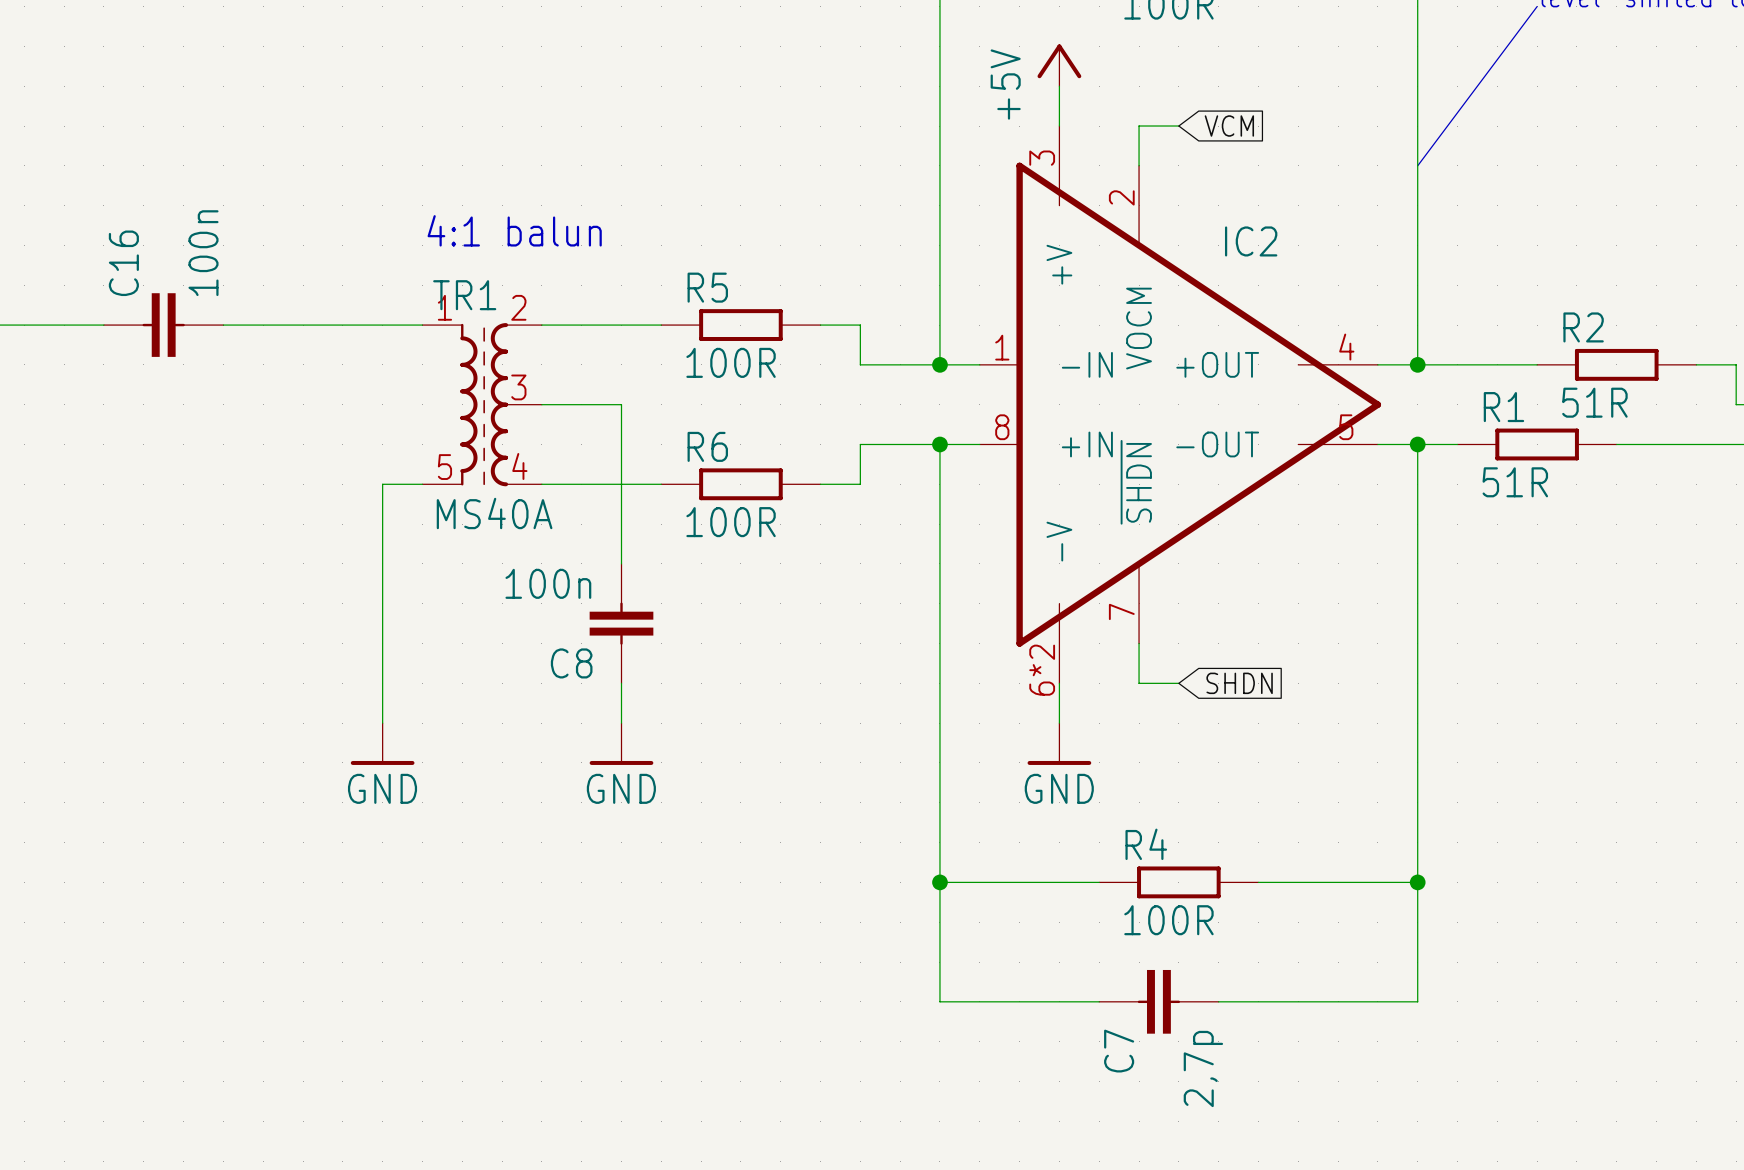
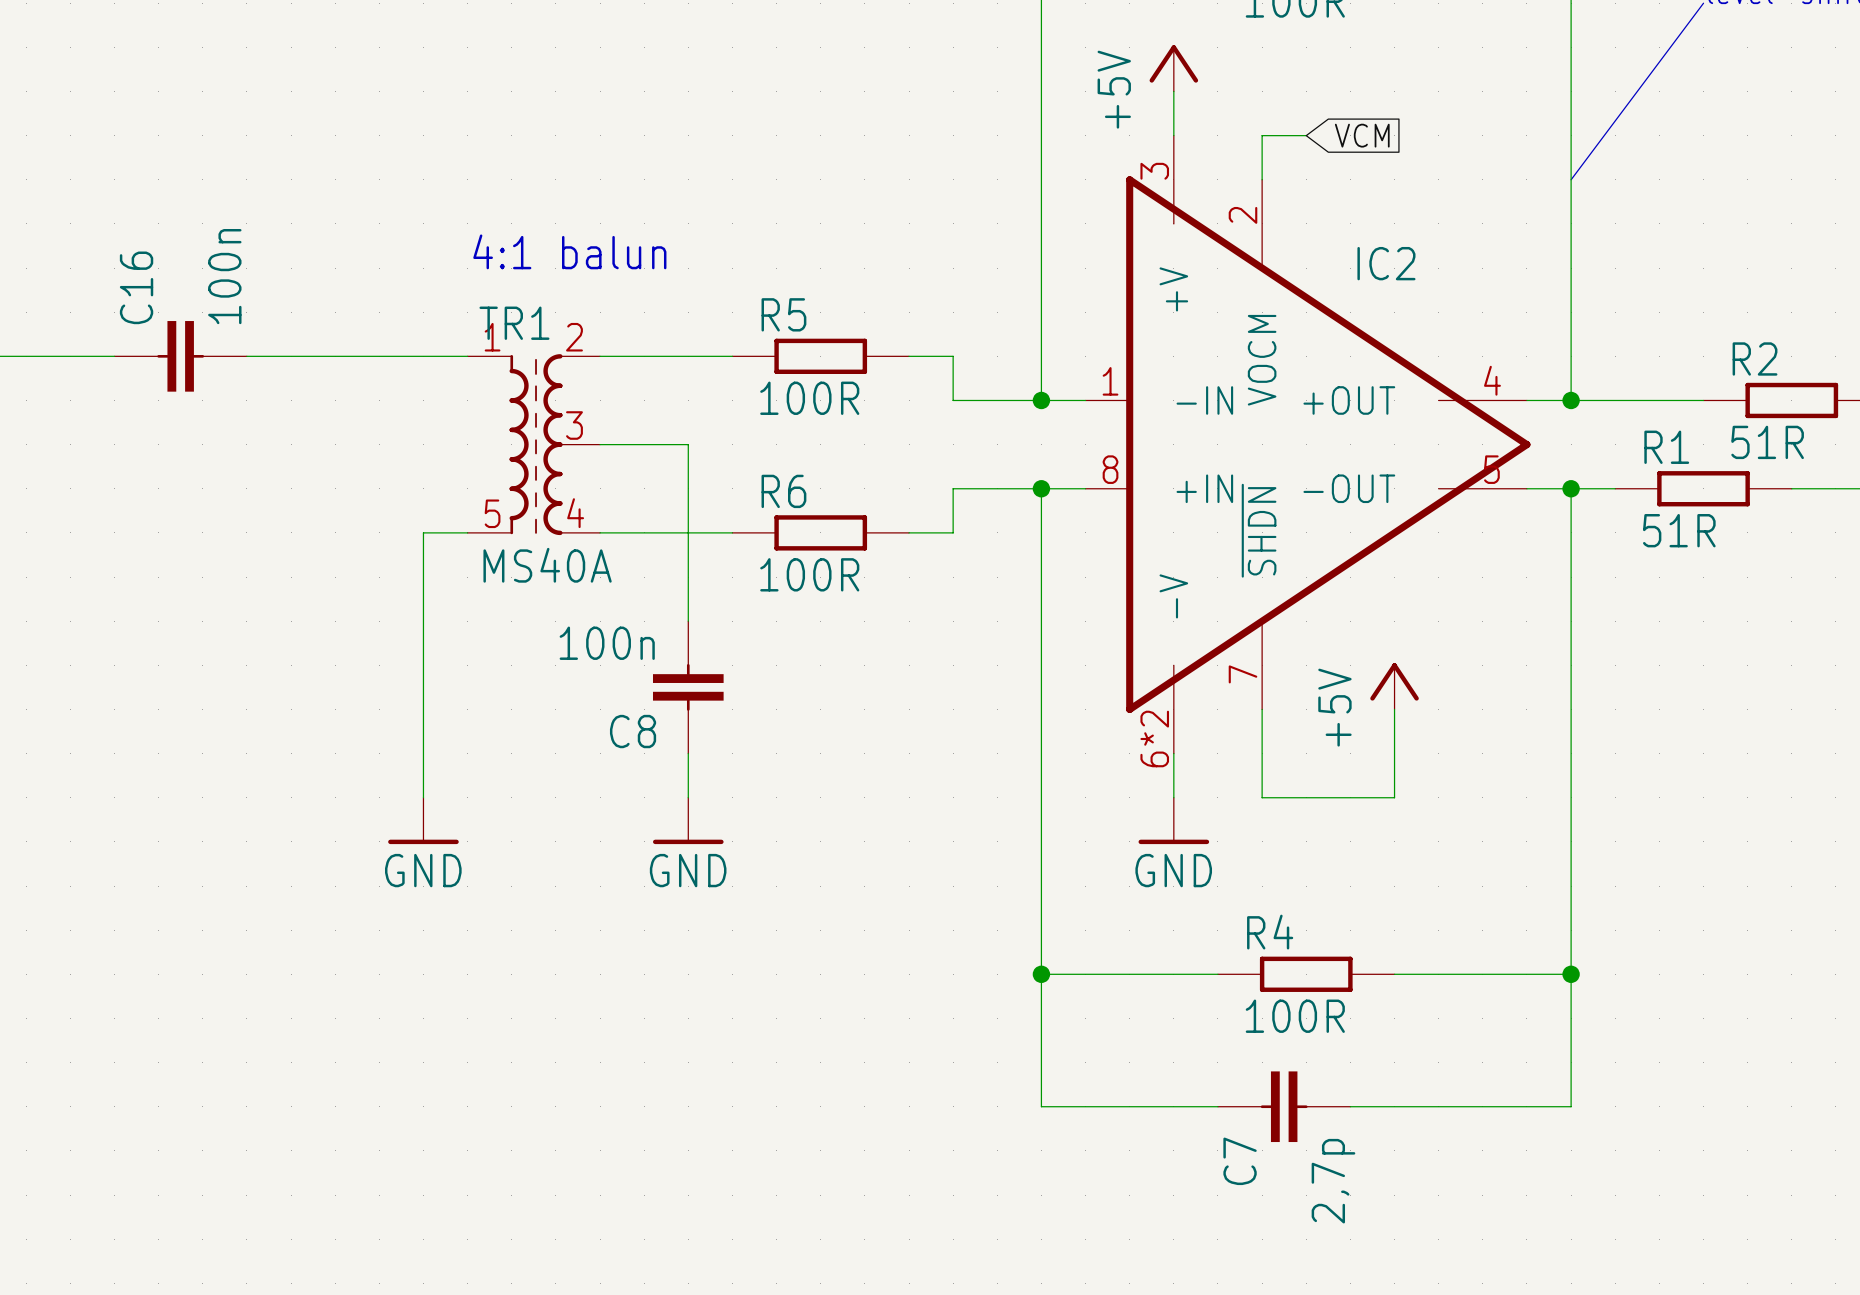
power symbol: none -> +5V (1394, 686)
wire: (1139, 683) (1178, 683) -> (1262, 753) (1262, 797) (1394, 797) (1394, 709)
global label: SHDN (1239, 683) -> none

